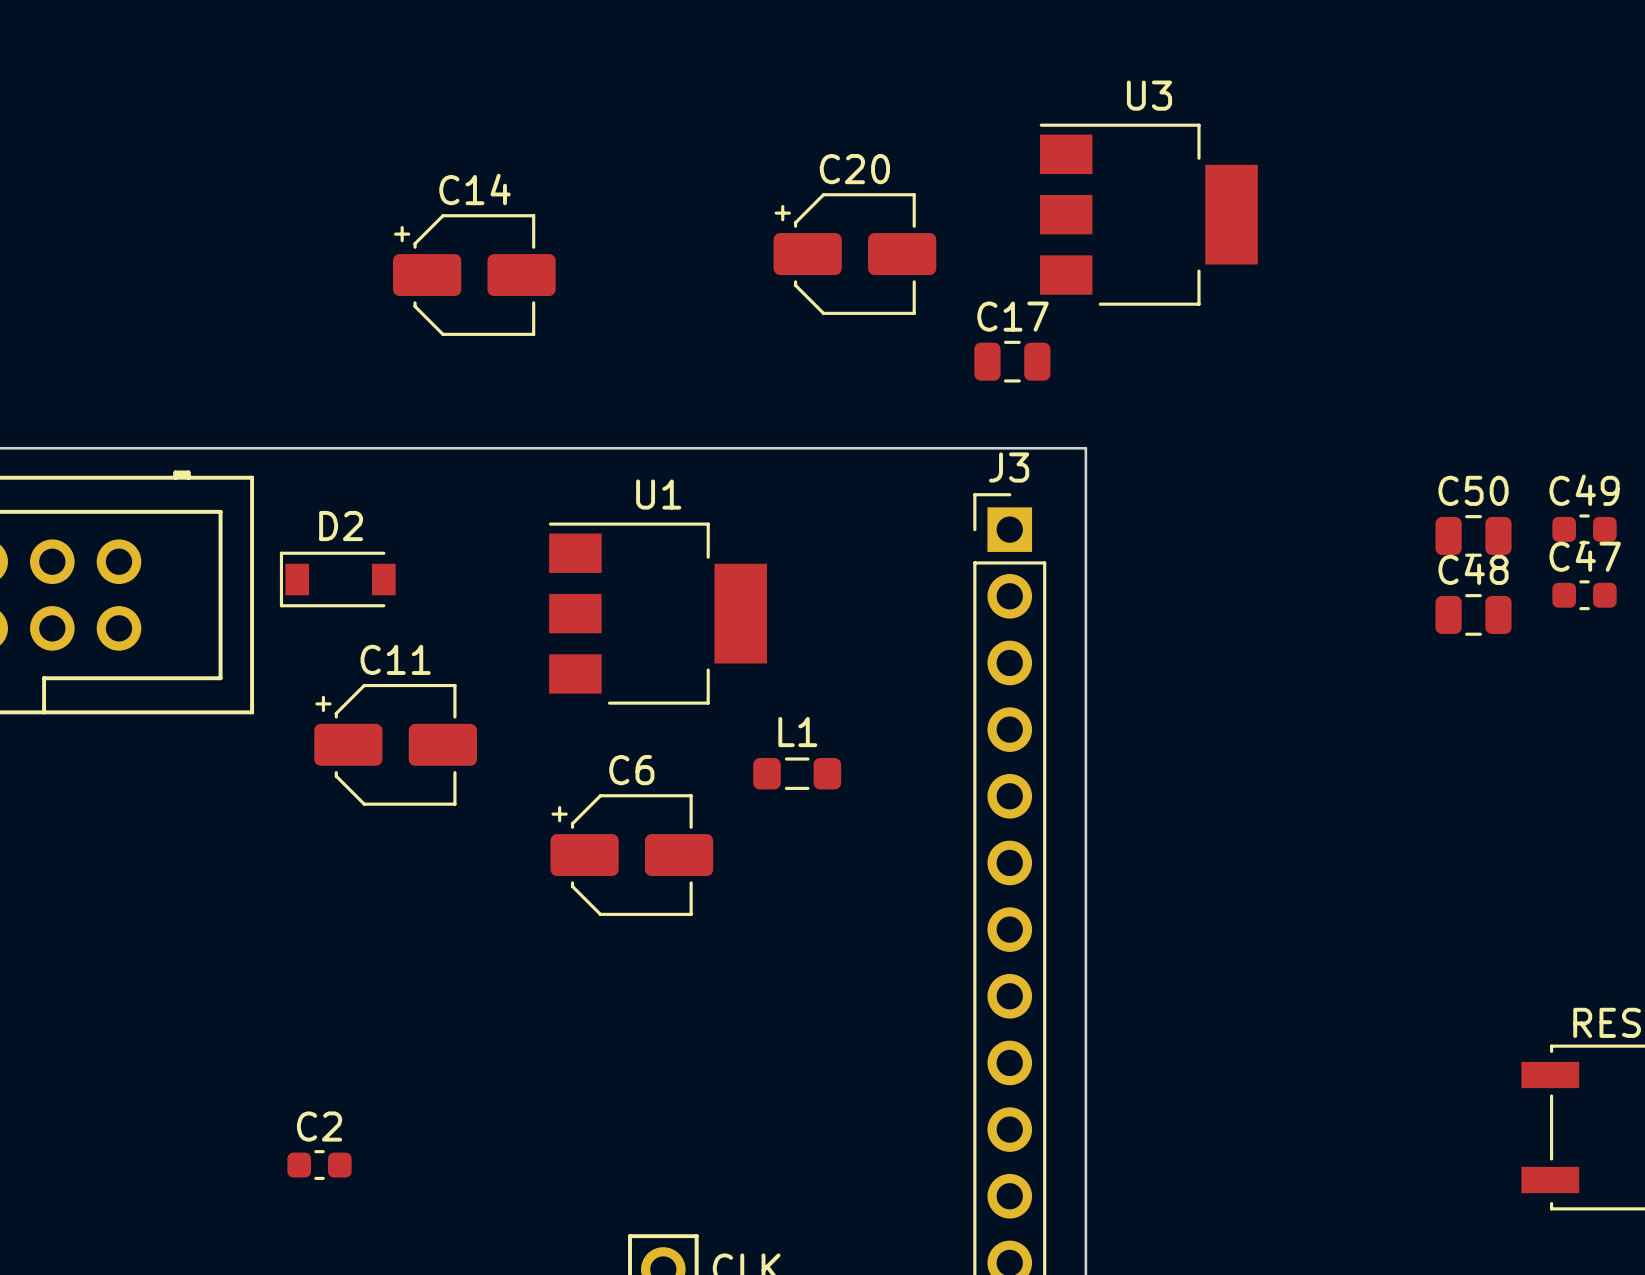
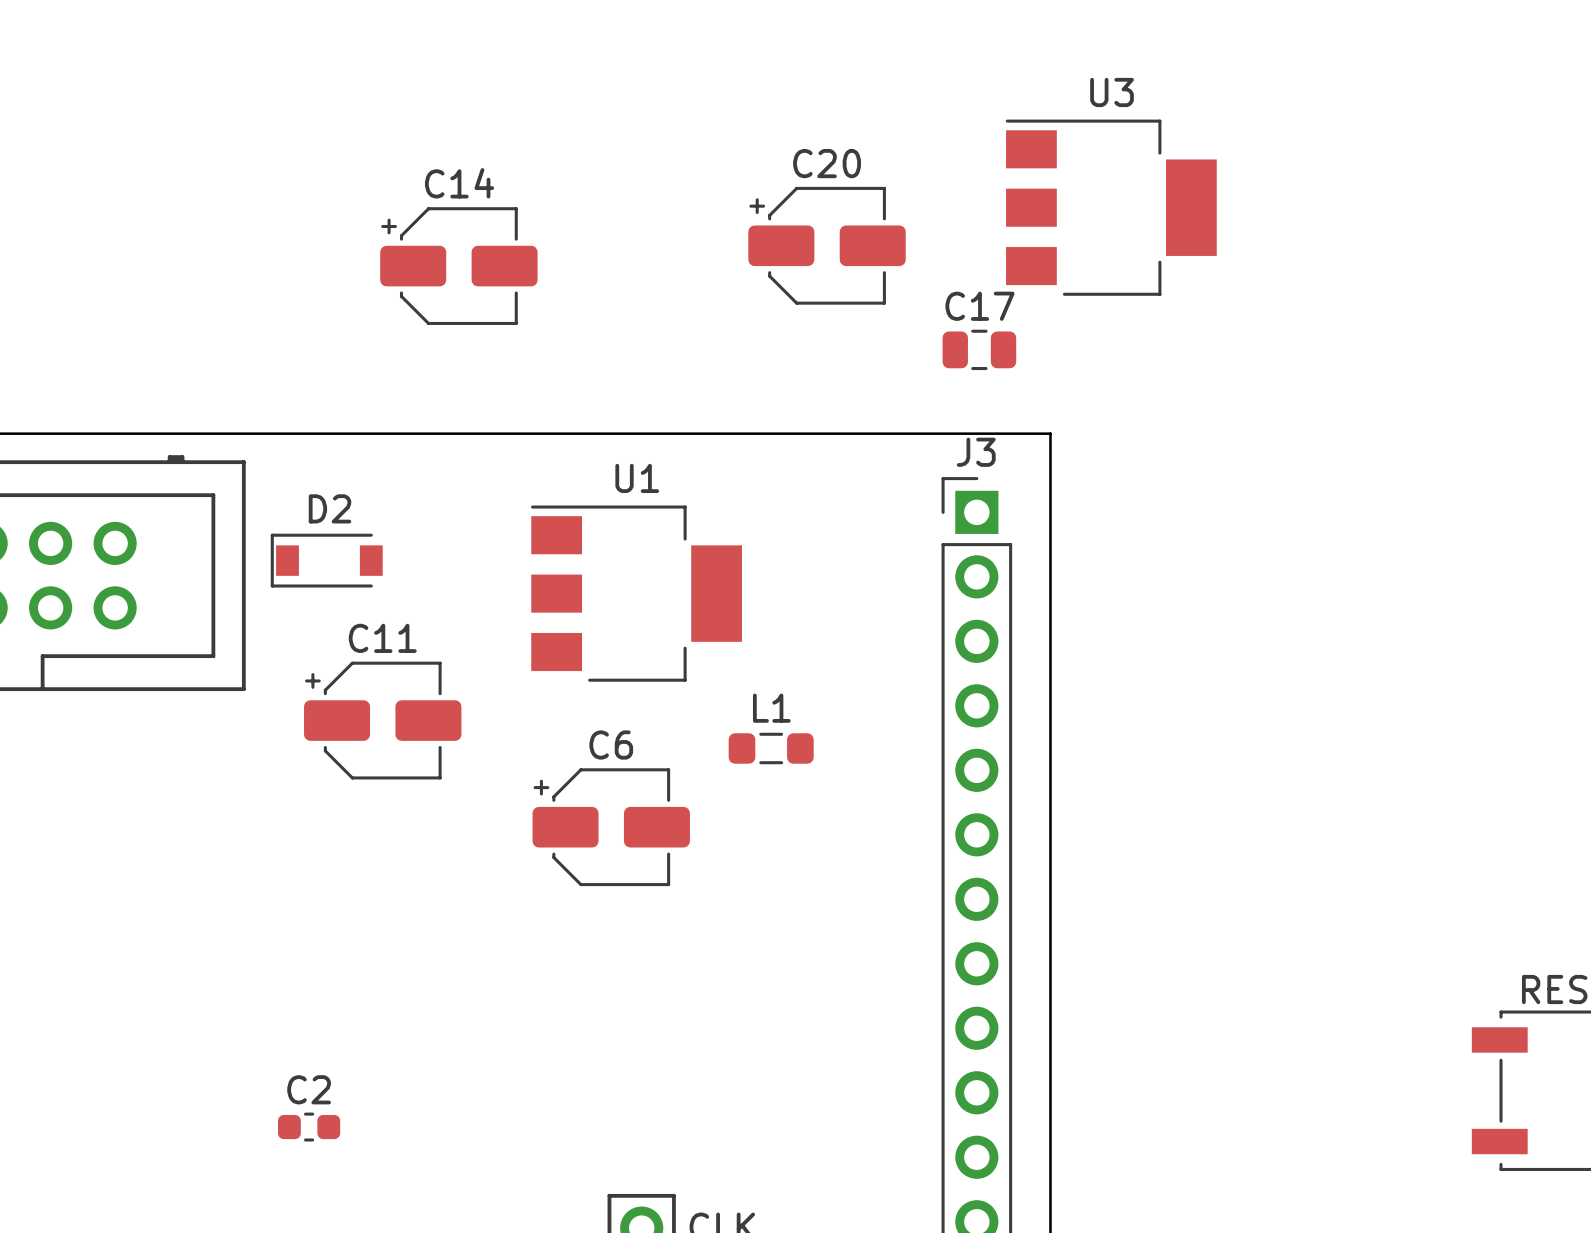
C49: (1584, 529) -> none
C50: (1473, 535) -> none
C47: (1584, 595) -> none
C48: (1473, 614) -> none

